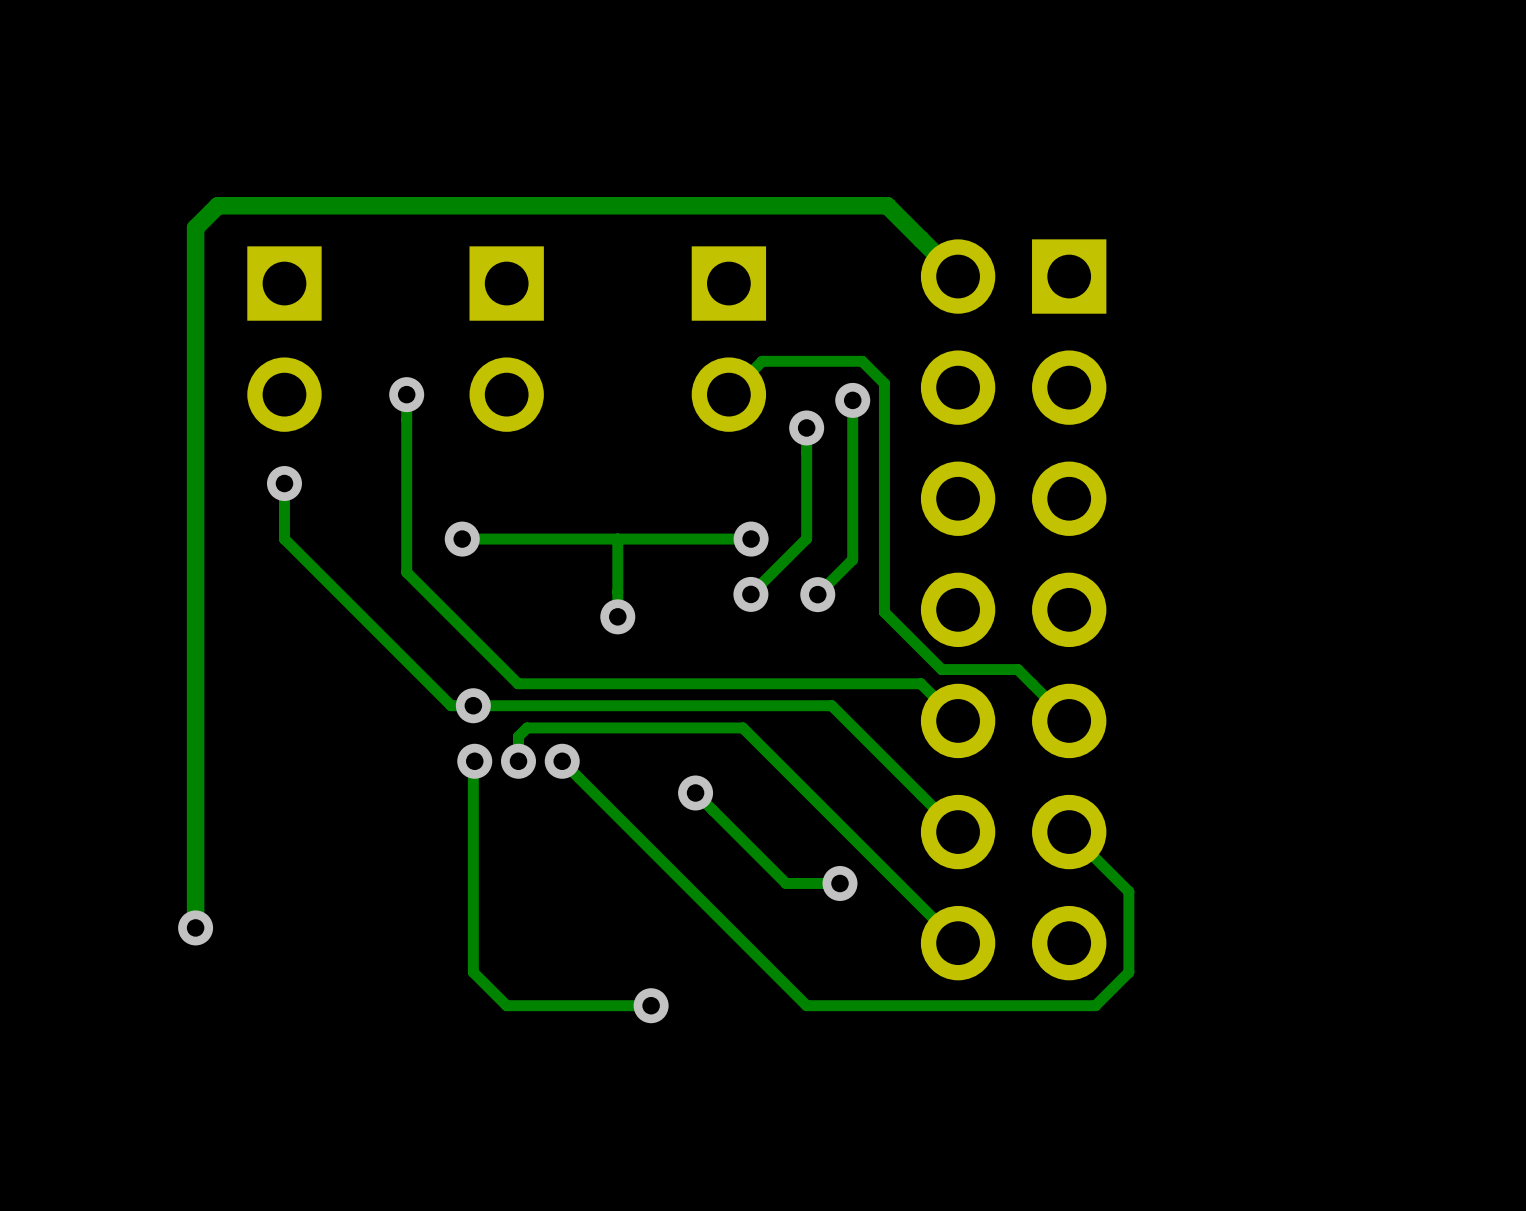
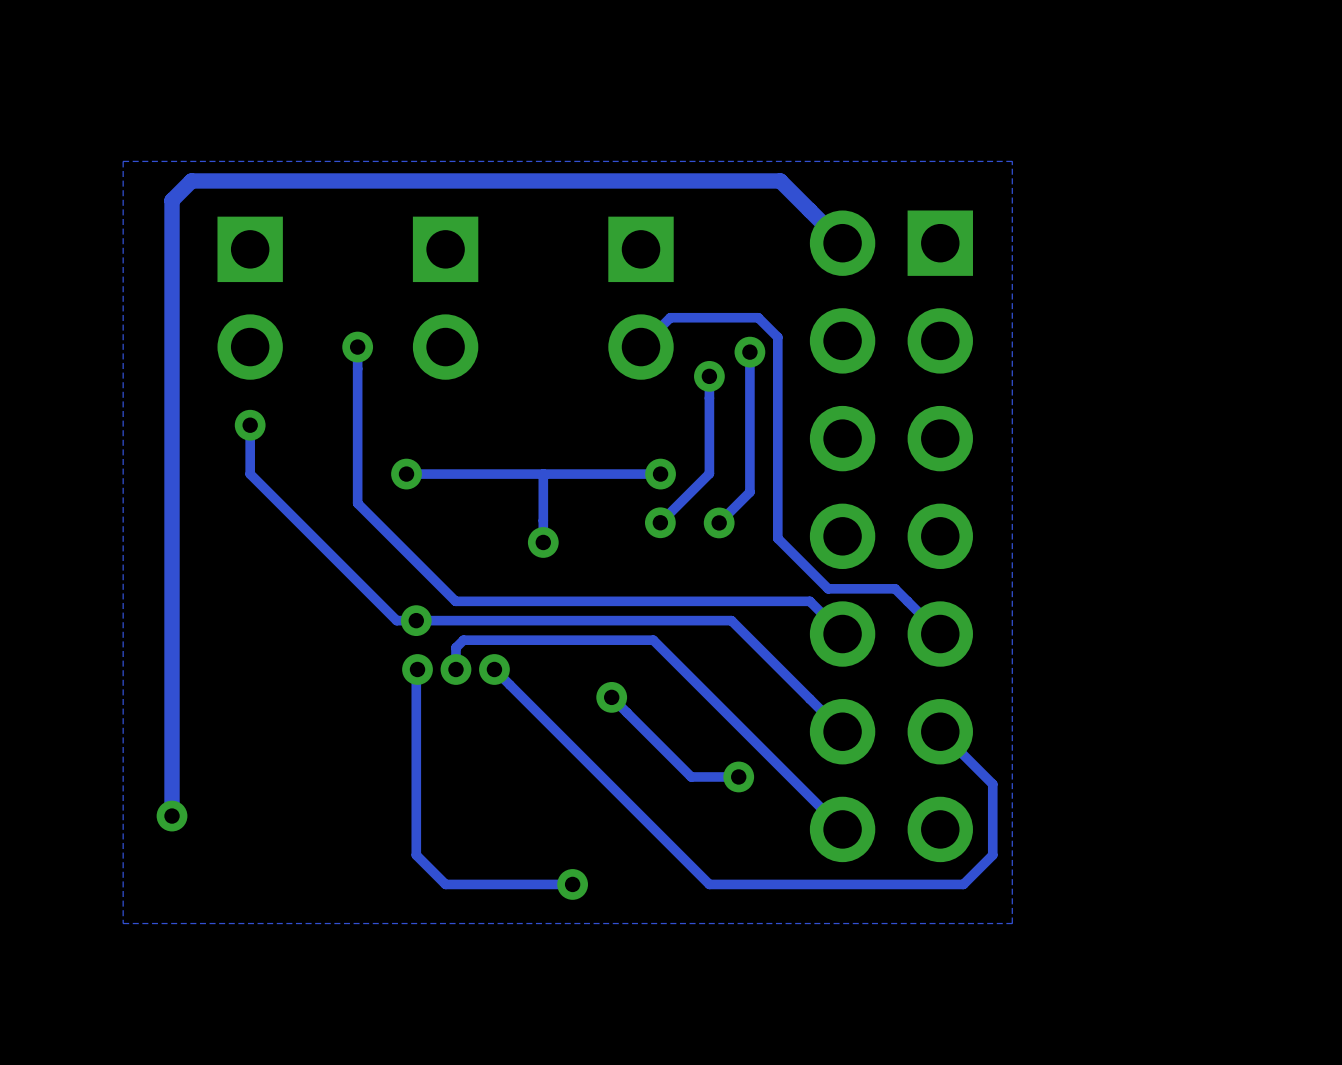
zone outline: none -> (1012, 161) (123, 161) (123, 923) (1012, 923) (1012, 161)

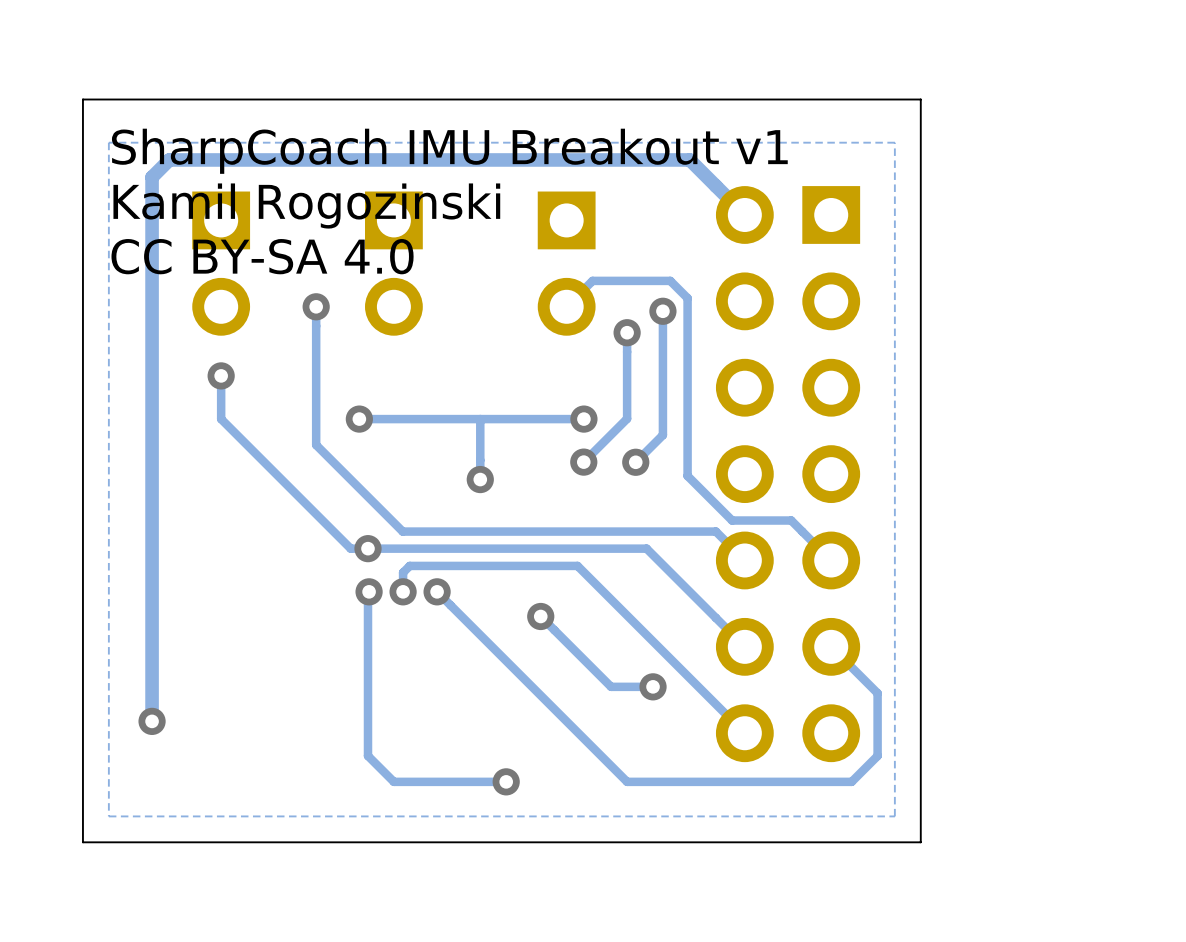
board edge: none -> (920, 99) (920, 842) (82, 842) (82, 99) (920, 99)
text: none -> SharpCoach IMU Breakout v1 (449, 151)
text: none -> Kamil Rogozinski (306, 206)
text: none -> CC BY-SA 4.0 (262, 256)

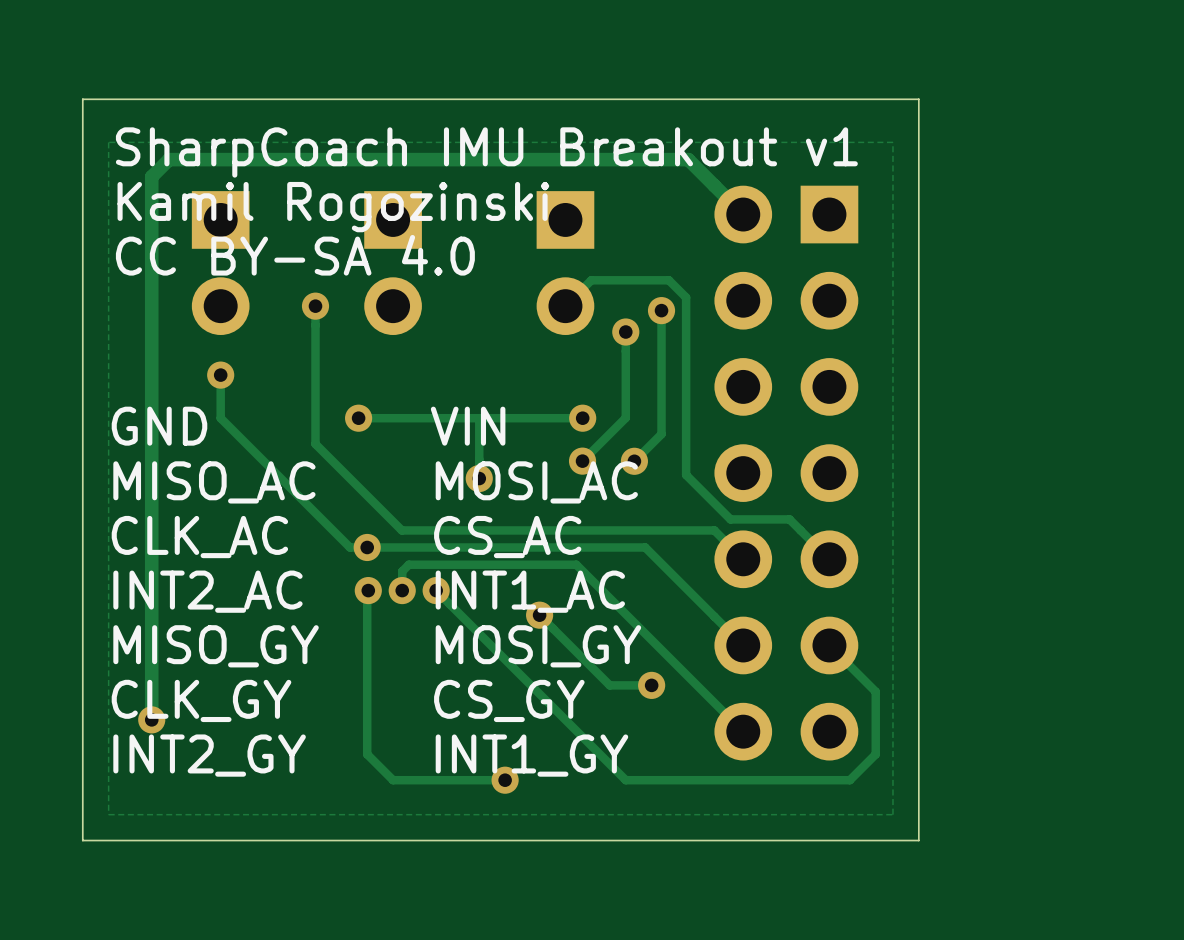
text: none -> GND (159, 426)
text: none -> VIN (468, 426)
text: none -> MISO_AC (214, 482)
text: none -> MOSI_AC (536, 482)
text: none -> CLK_AC (199, 537)
text: none -> CS_AC (507, 537)
text: none -> INT2_AC (207, 591)
text: none -> INT1_AC (530, 591)
text: none -> MISO_GY (216, 646)
text: none -> MOSI_GY (538, 646)
text: none -> CLK_GY (201, 700)
text: none -> CS_GY (509, 700)
text: none -> INT2_GY (209, 755)
text: none -> INT1_GY (531, 755)

